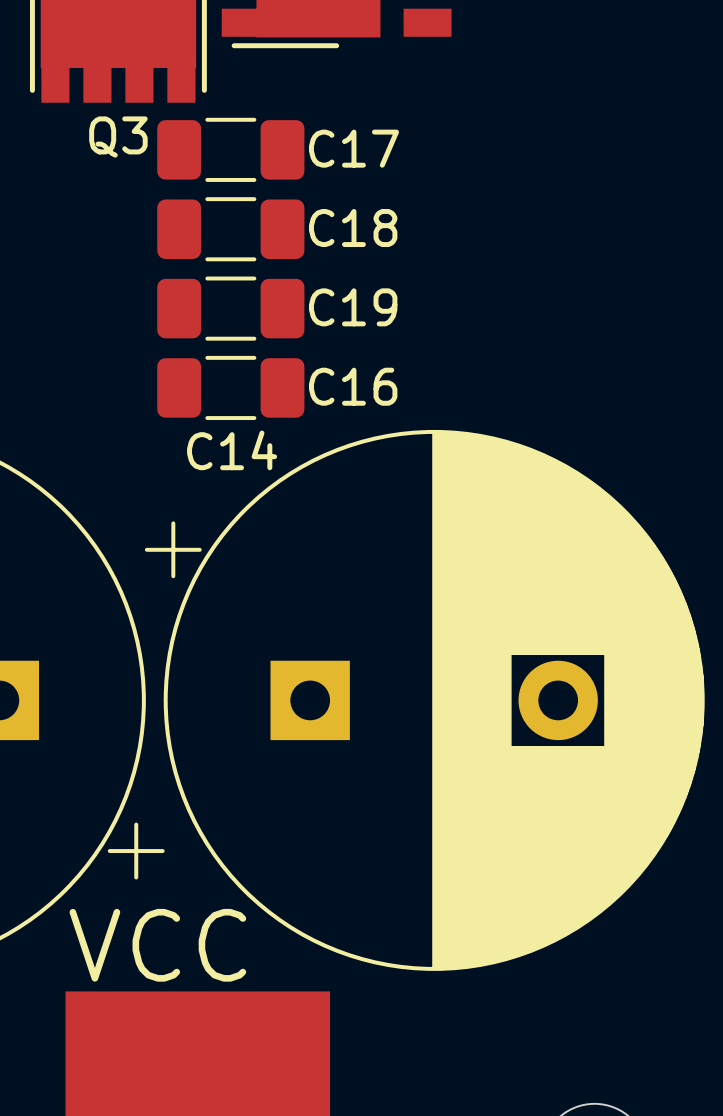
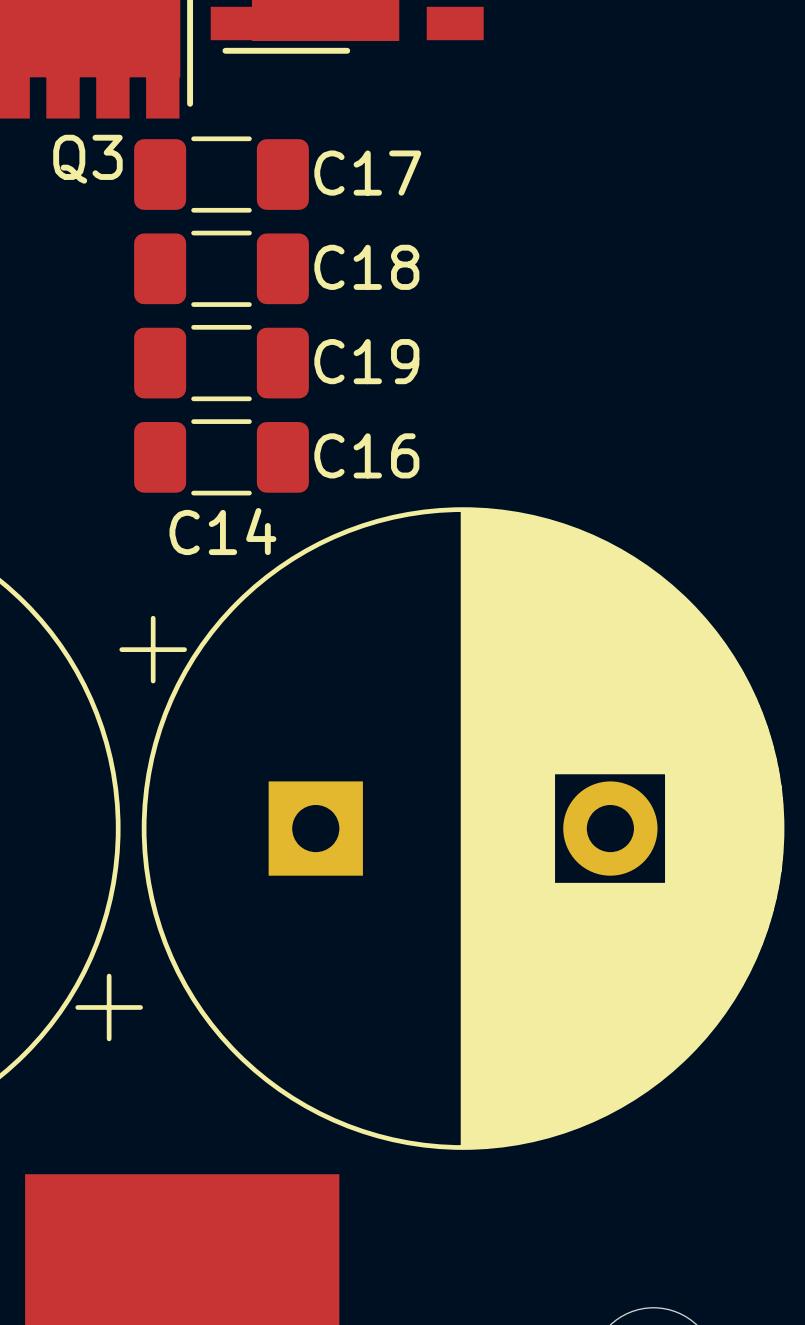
text: VCC (157, 945) -> none

